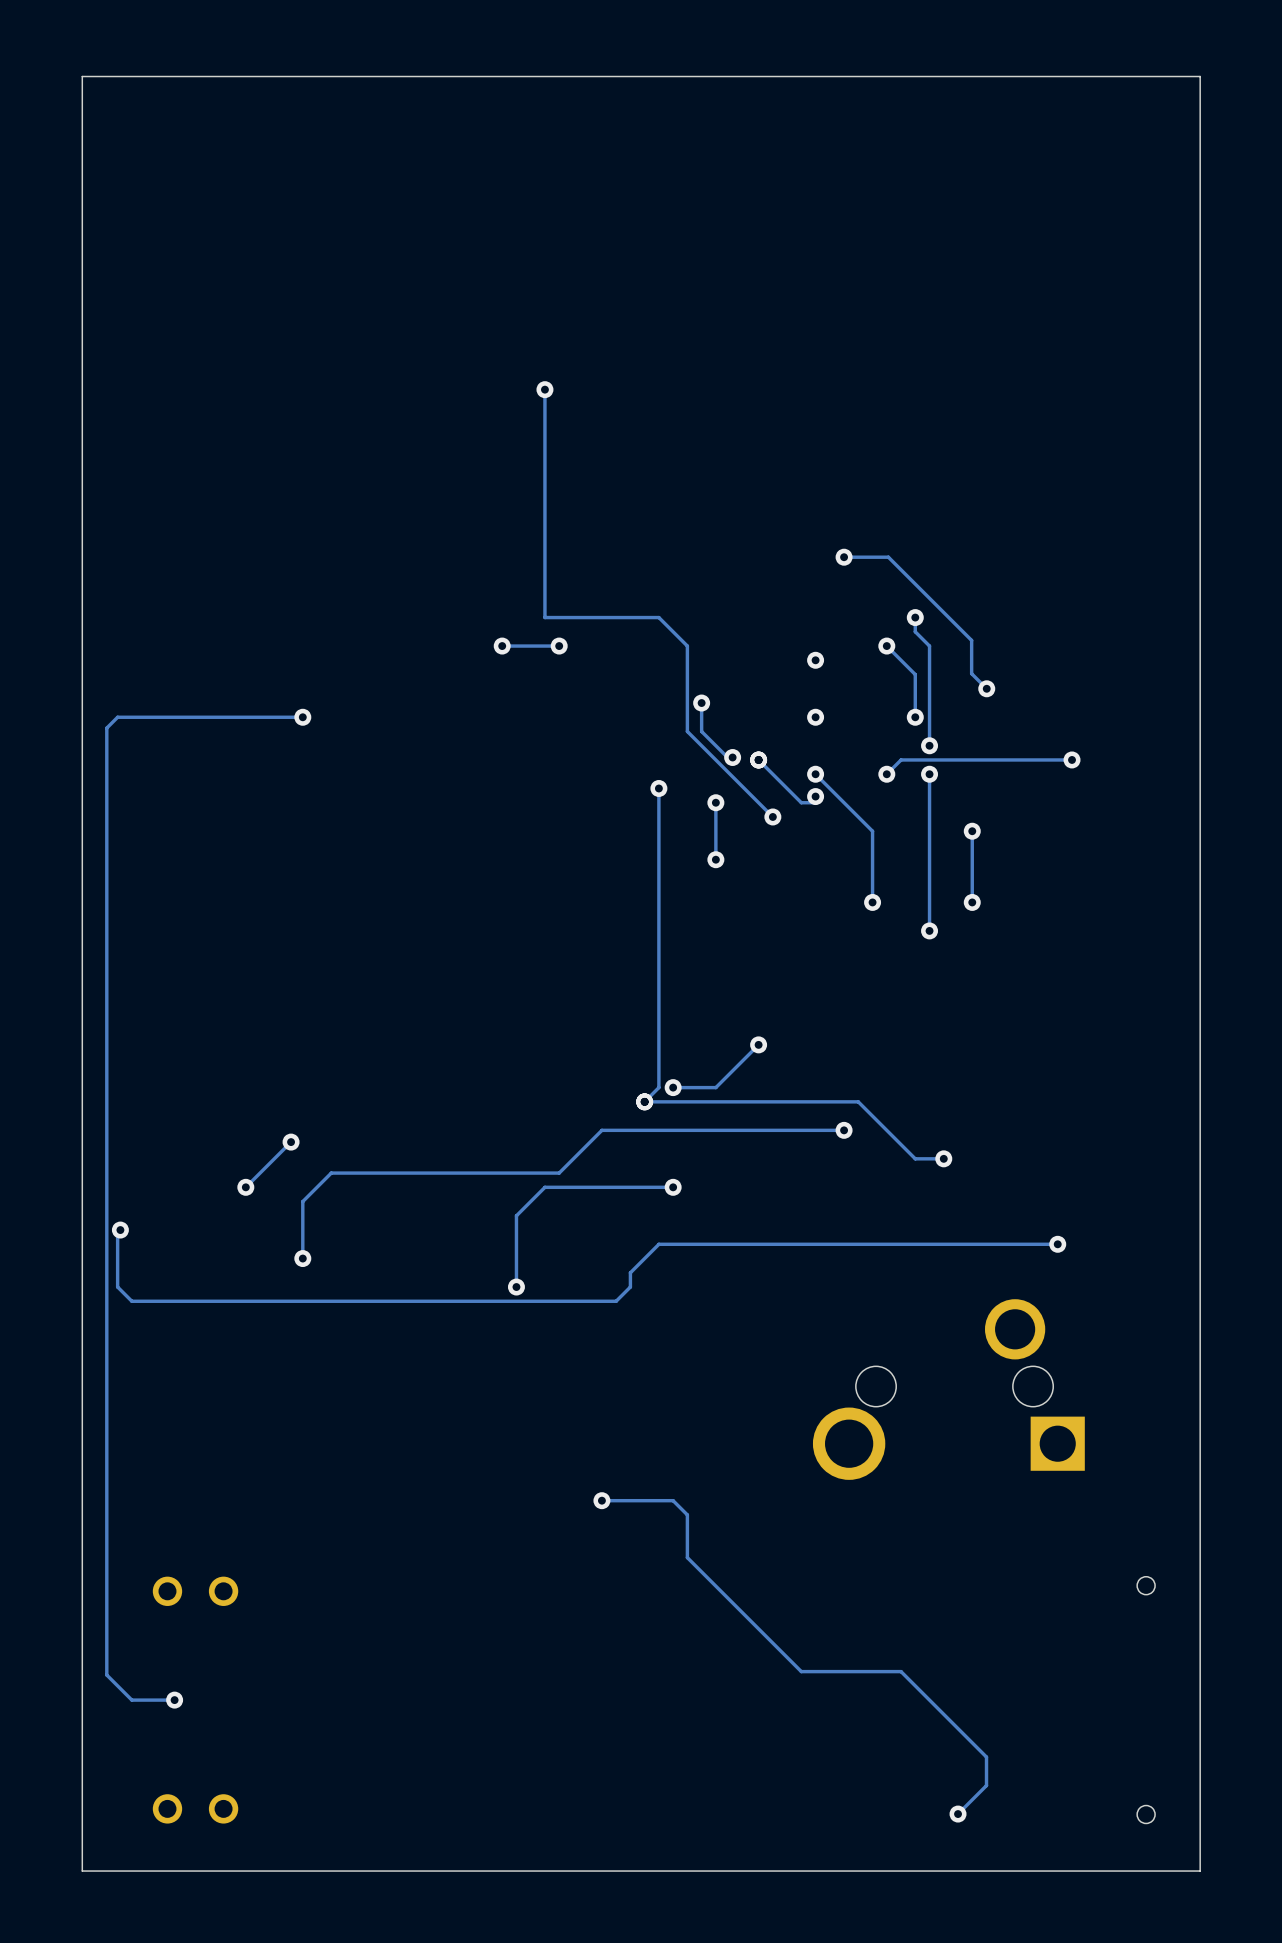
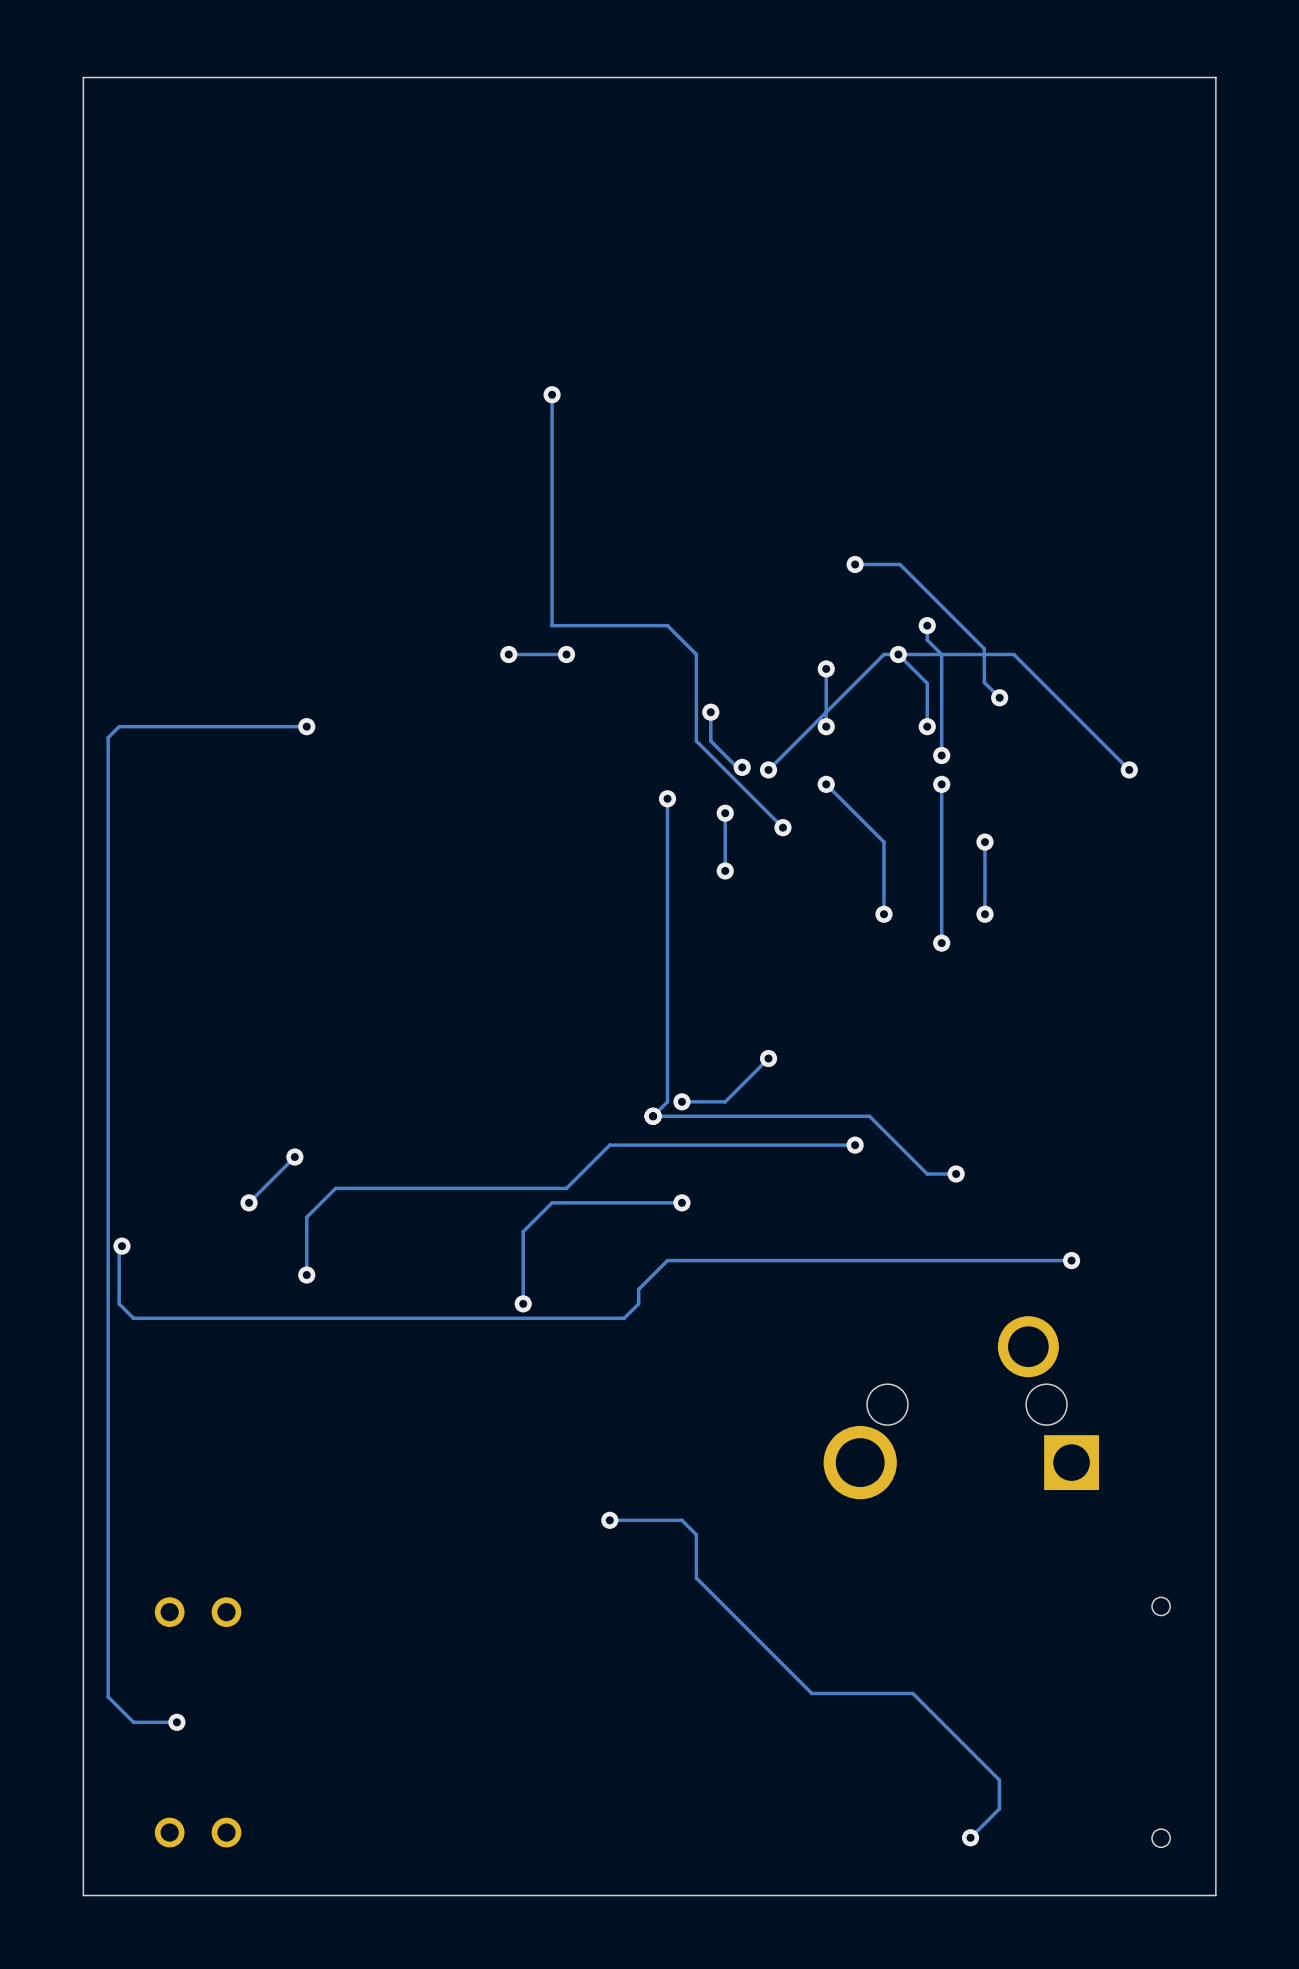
track: none -> (826, 668) (826, 726)
track: (1072, 759) (901, 759) (886, 774) -> none
via position: (1072, 759) -> (1129, 769)
track: (758, 760) (801, 802) (815, 802) (815, 796) -> (768, 769) (883, 654) (1013, 654) (1129, 769)
via: (886, 774) -> none
via: (815, 796) -> none

